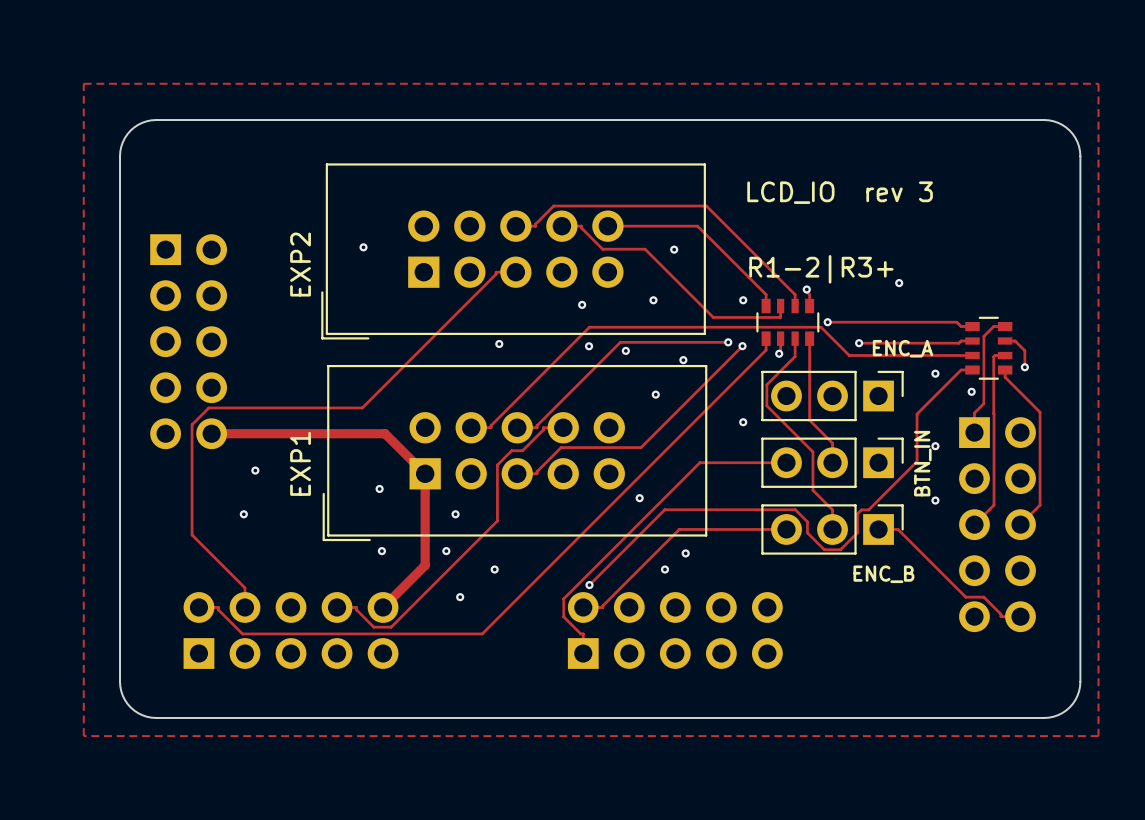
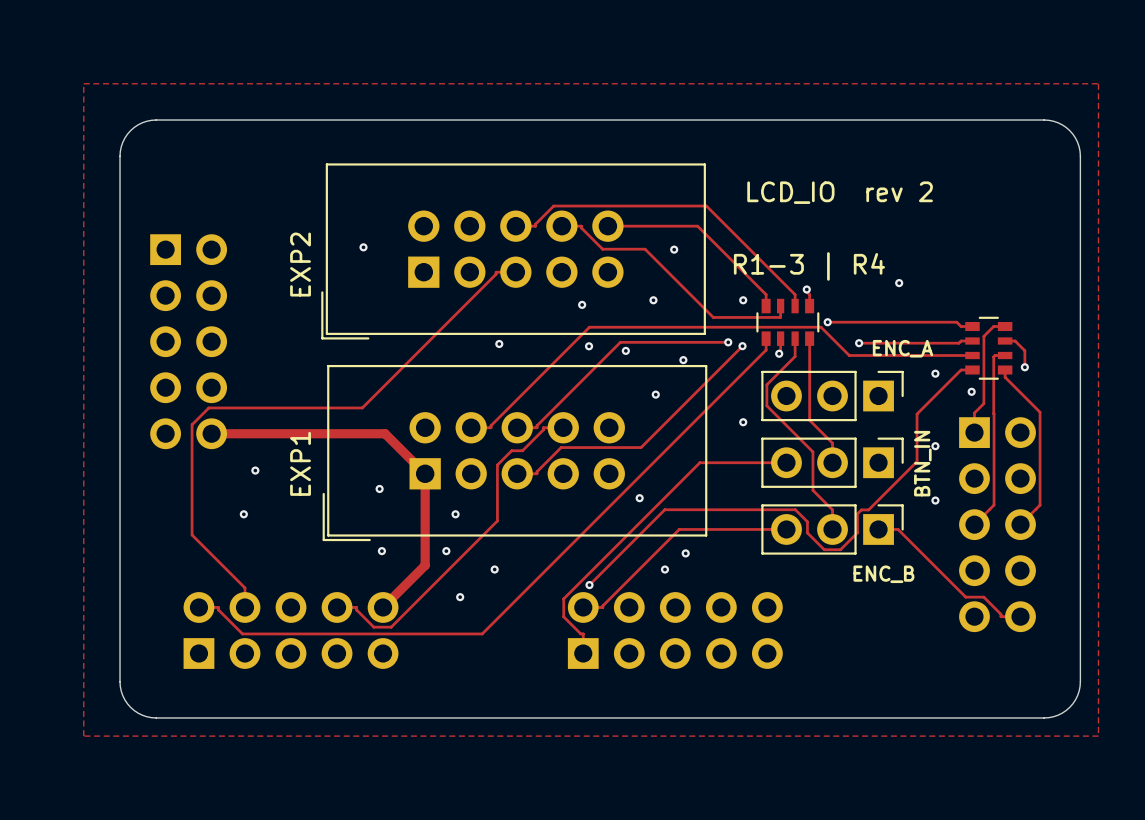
text: rev 3 (899, 191) -> rev 2 (899, 191)
text: R1-2|R3+ (821, 269) -> R1-3 | R4 (809, 266)

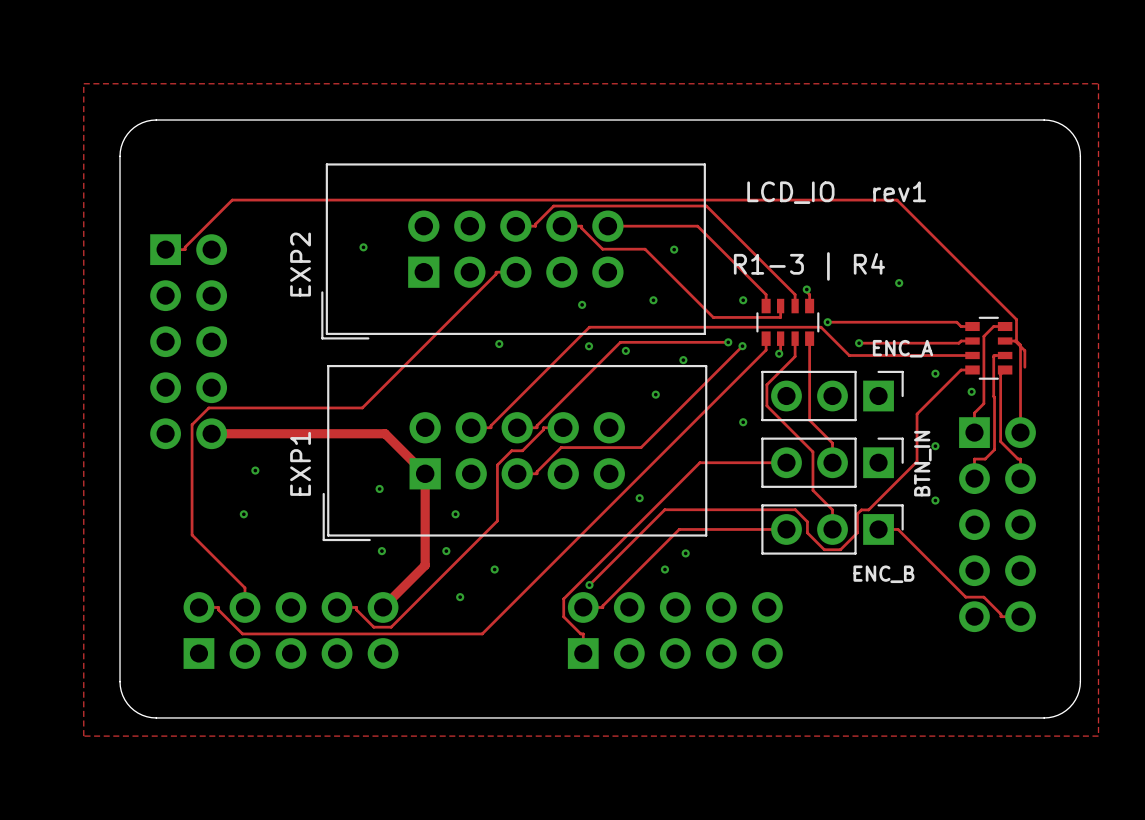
text: rev 2 (899, 191) -> rev1 (899, 191)
track: none -> (165, 249) (185, 249) (185, 247) (232, 200) (897, 200) (1016, 319) (1016, 341) (1020, 345) (1020, 432)
via: (1024, 367) -> none
track: (1005, 369) (1005, 377) (1040, 412) (1040, 505) (1020, 524) -> (1005, 369) (1000, 374) (1000, 441) (1018, 459) (1020, 459) (1020, 478)
track: (993, 396) (994, 505) (974, 524) -> (993, 396) (994, 449) (985, 459) (974, 459) (974, 478)

